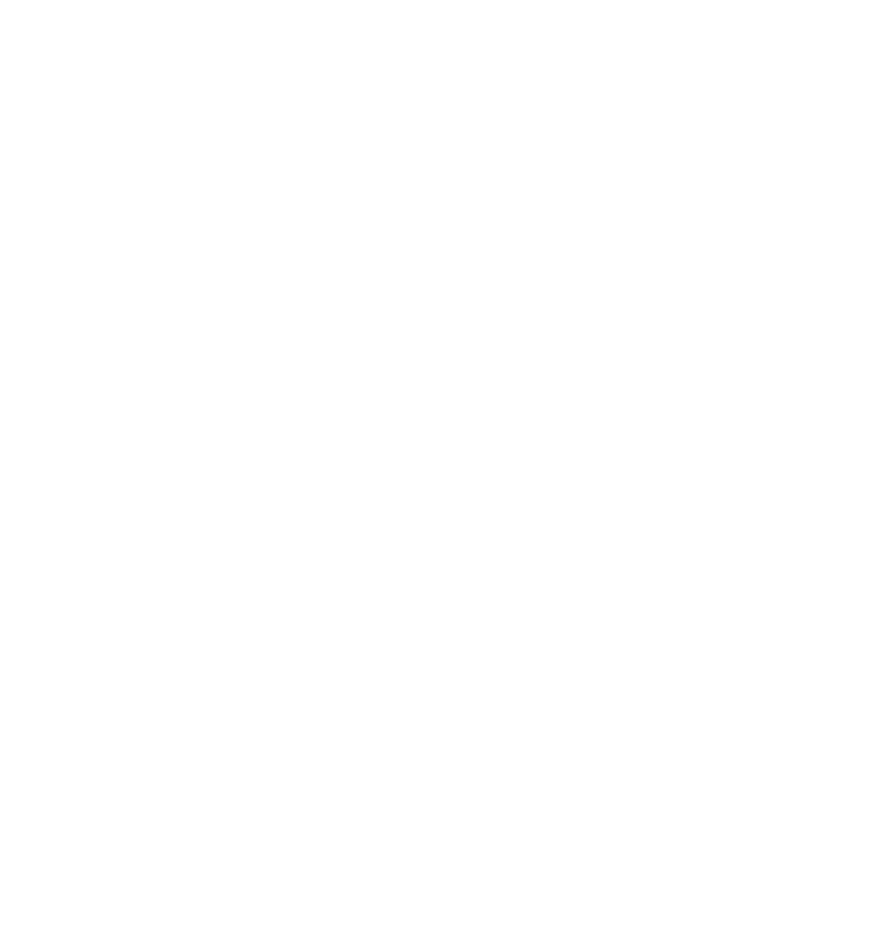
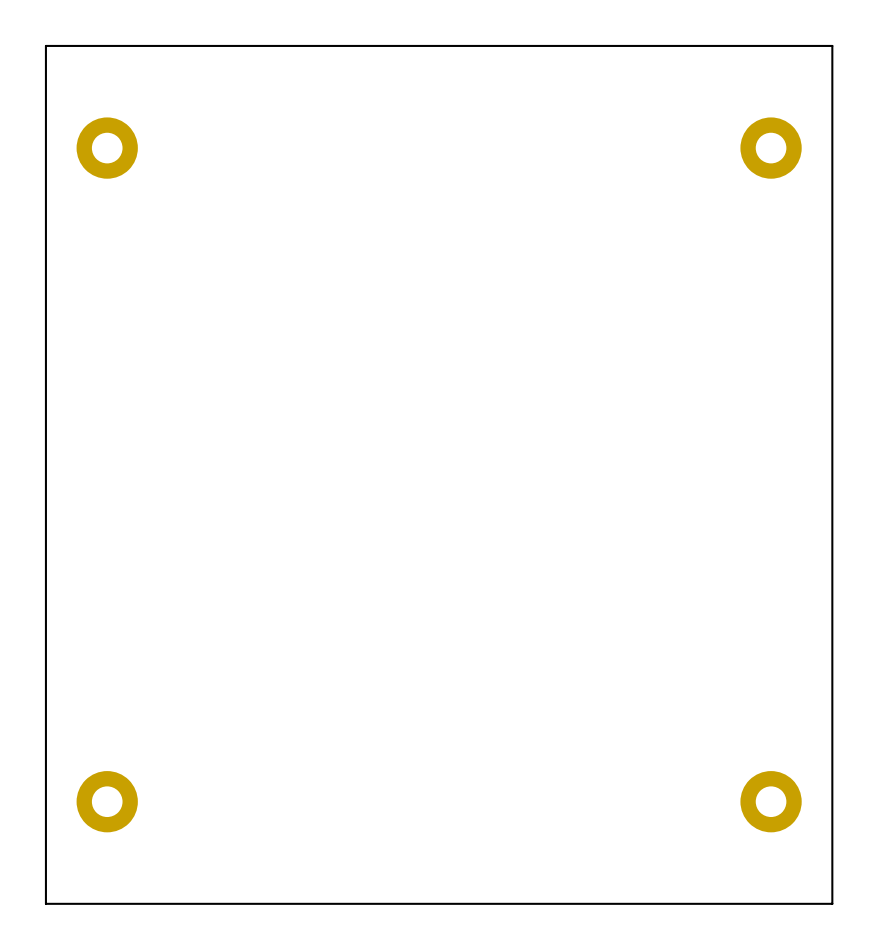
board edge: none -> (832, 45) (45, 45) (45, 903) (832, 903) (832, 45)
part: none -> (107, 148)
part: none -> (771, 148)
part: none -> (107, 801)
part: none -> (771, 801)

